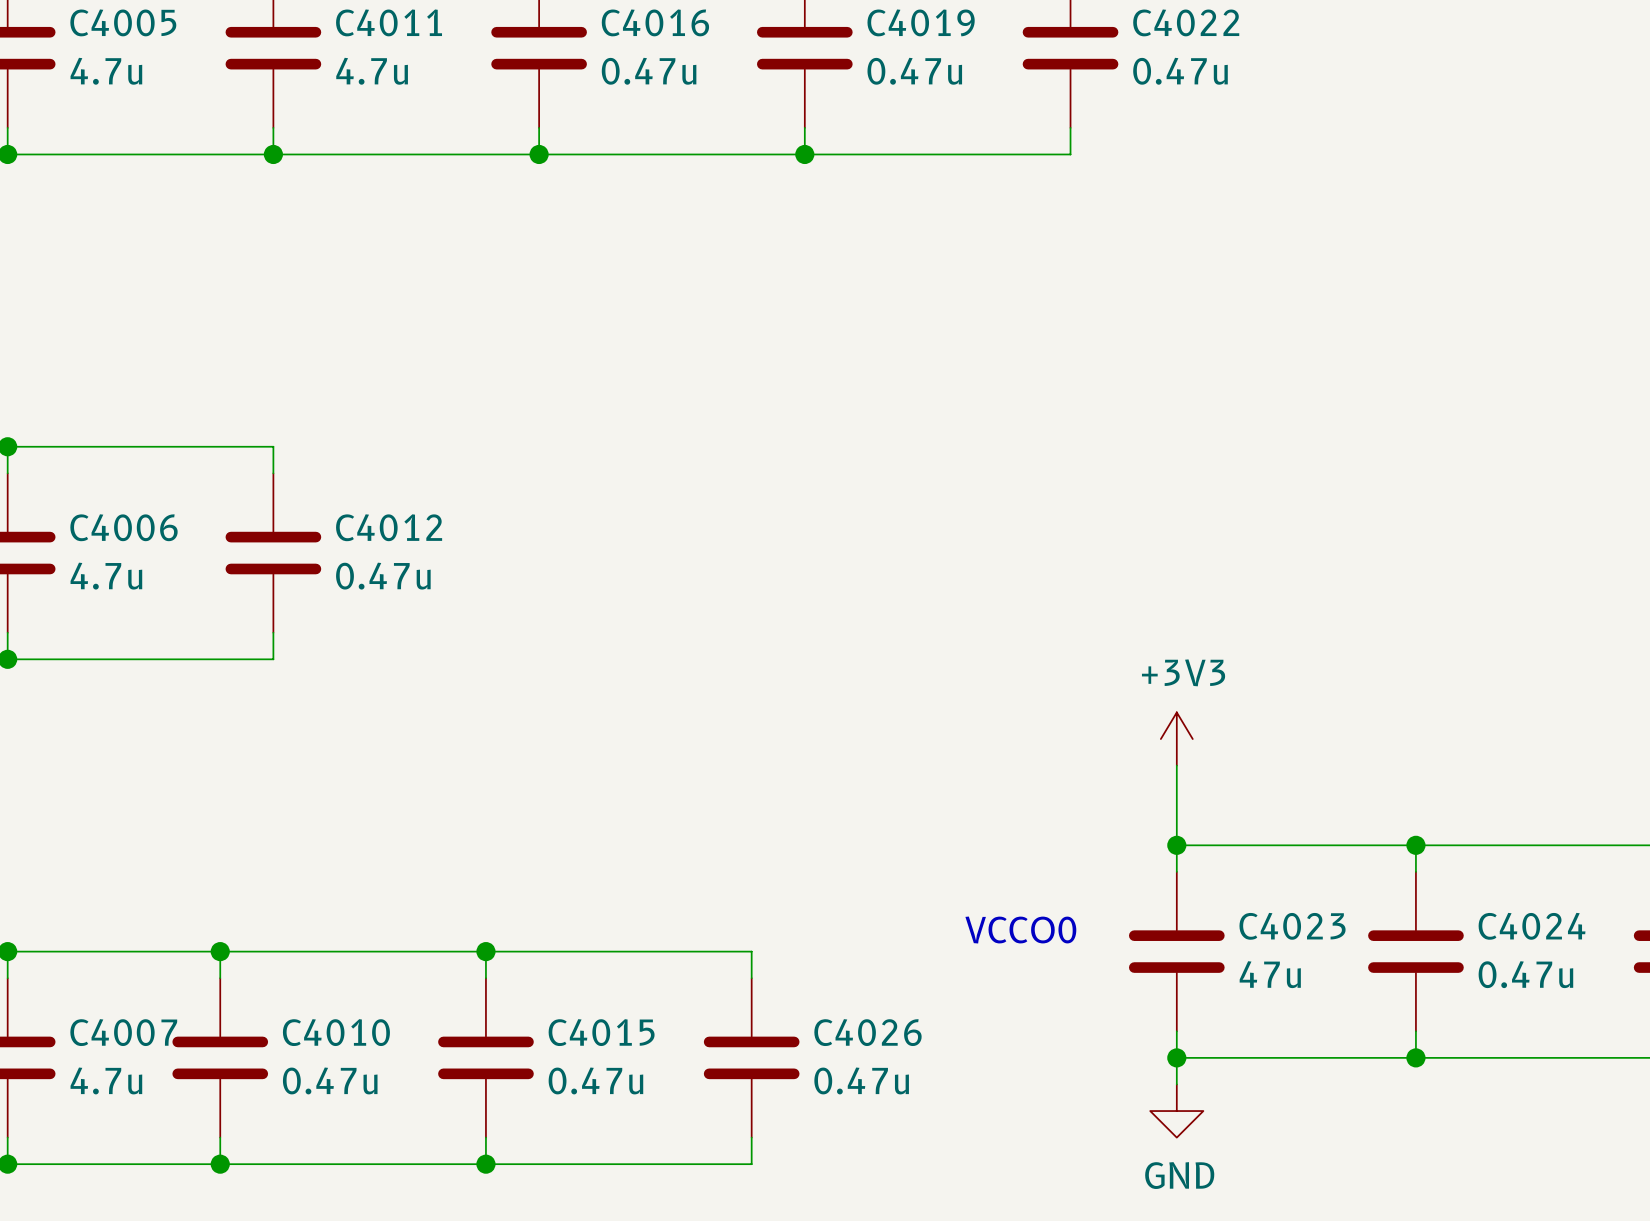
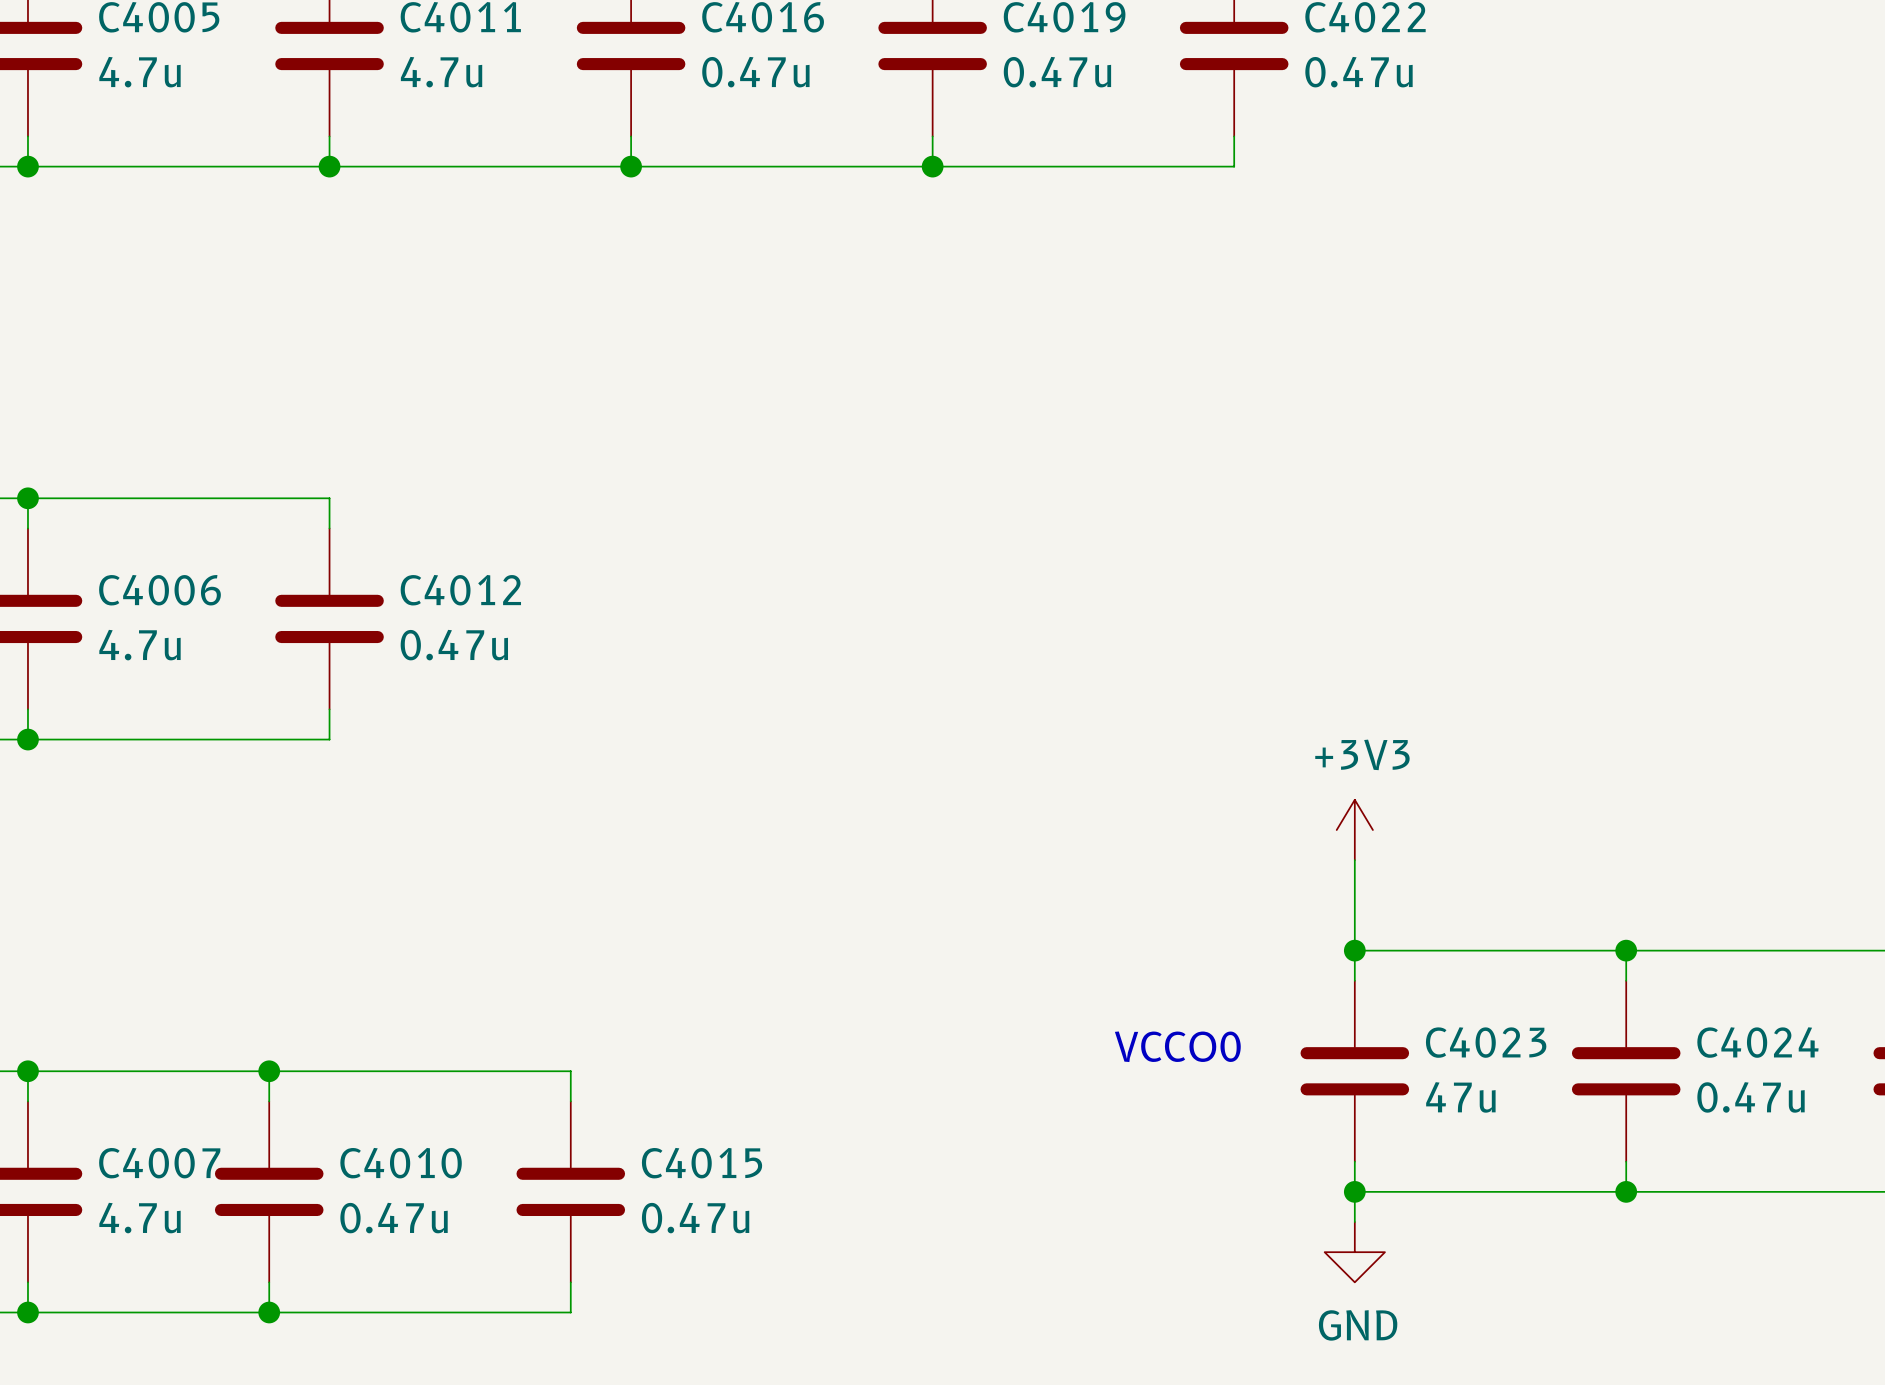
wire: (485, 951) (751, 951) (751, 978) -> none
junction: (485, 951) -> none
C4026: 0.47u (751, 1057) -> none
wire: (751, 1137) (751, 1164) (485, 1164) -> none
junction: (485, 1164) -> none

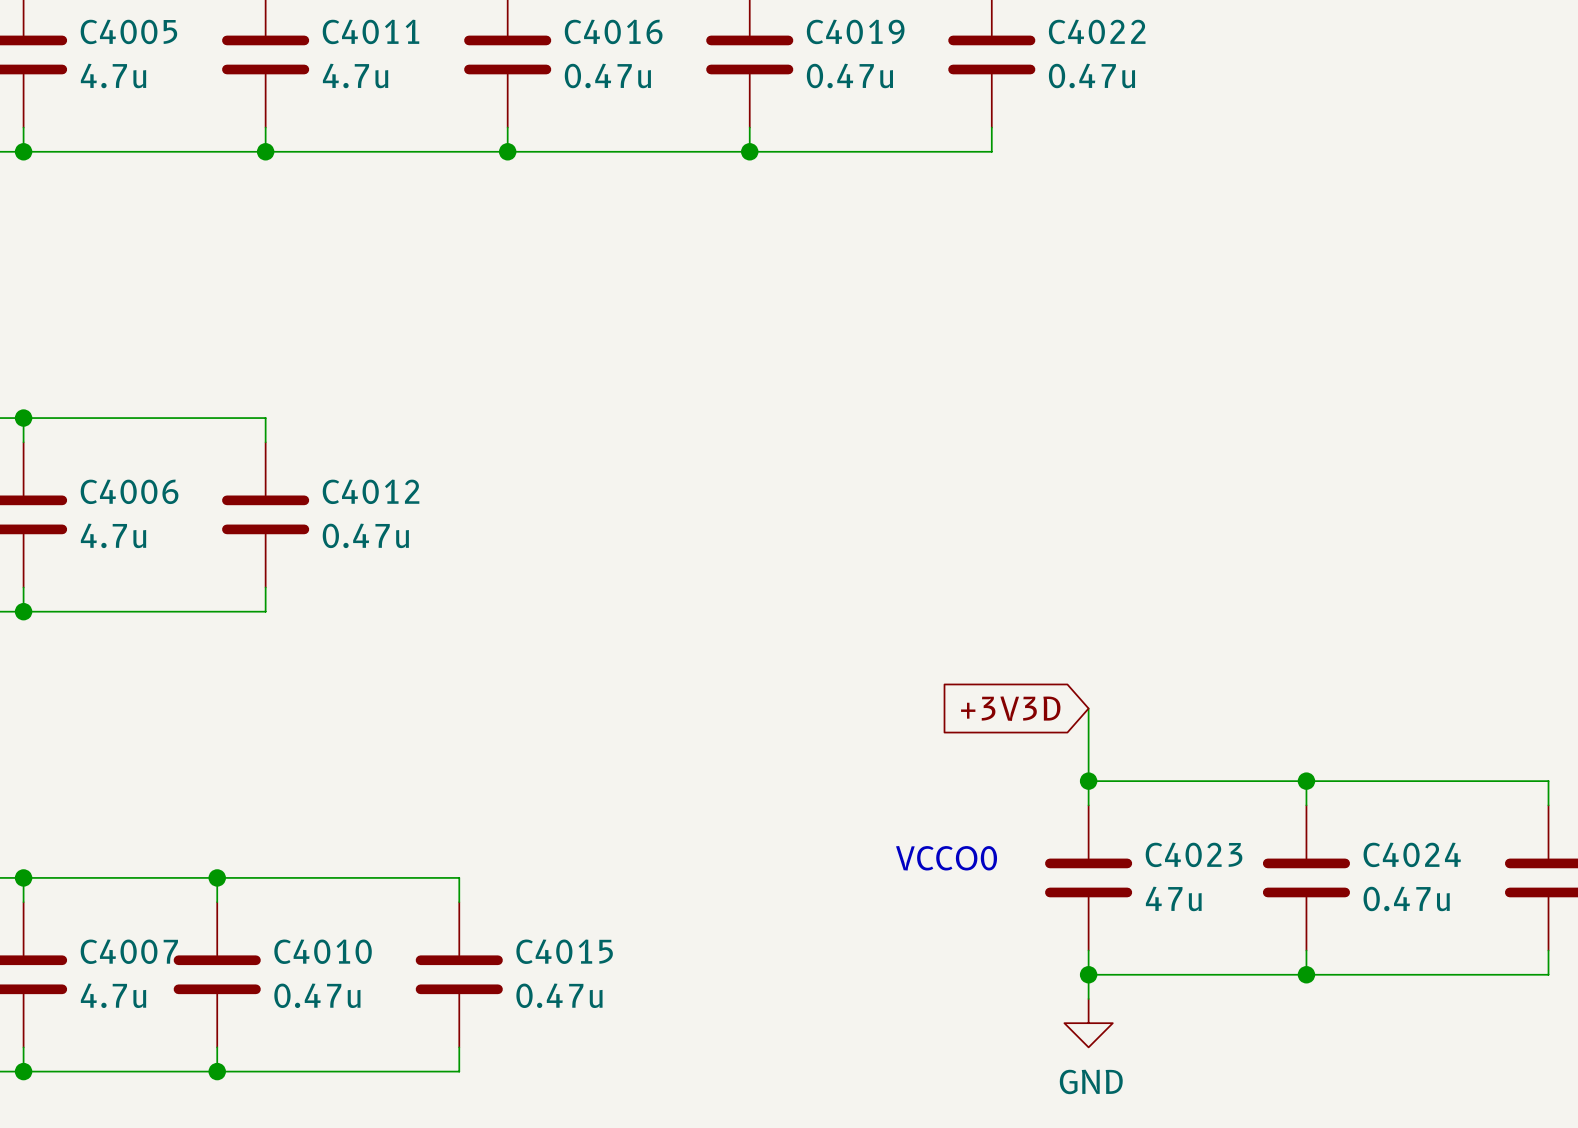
power symbol: +3V3 (1354, 830) -> none
global label: none -> +3V3D (1010, 708)

